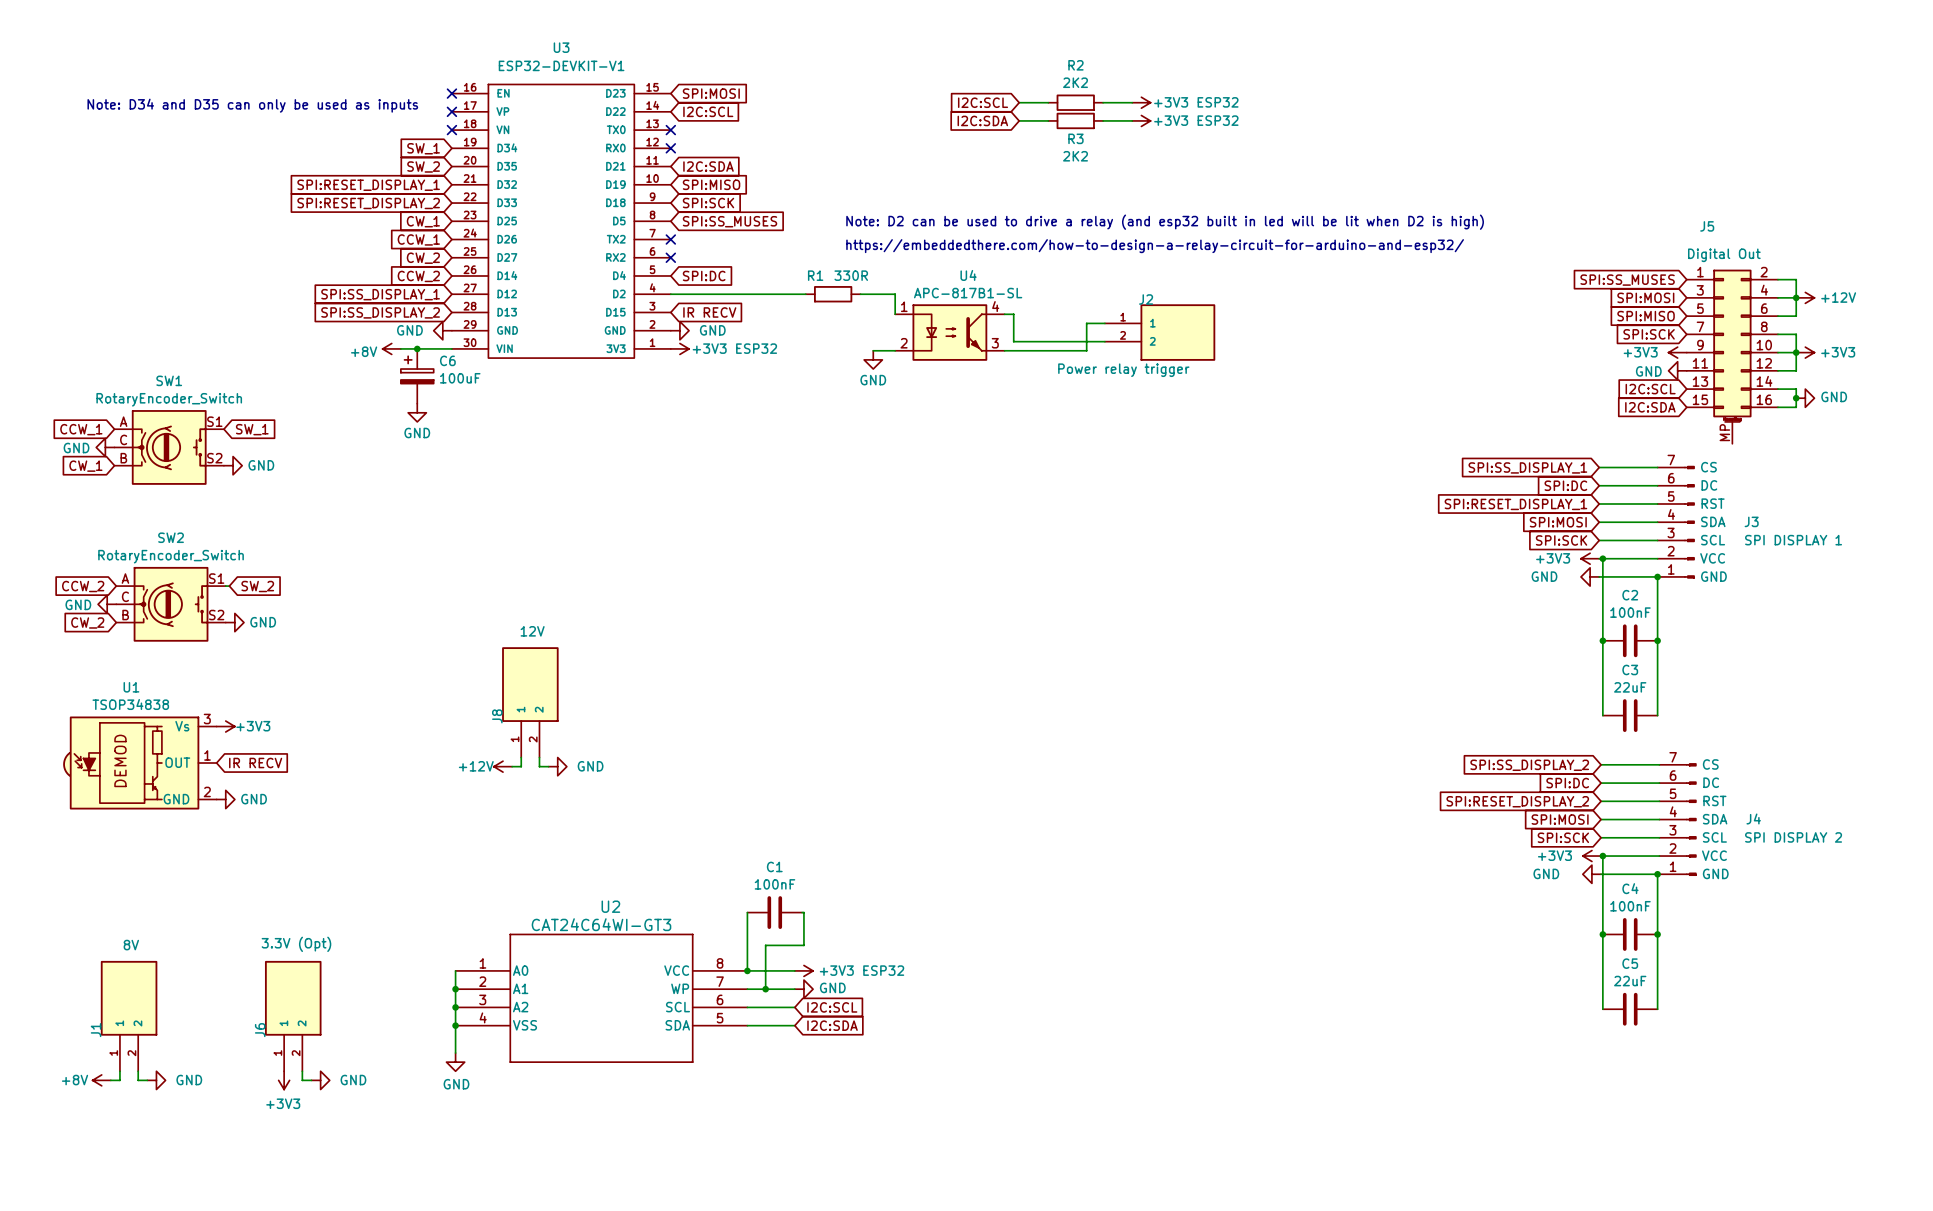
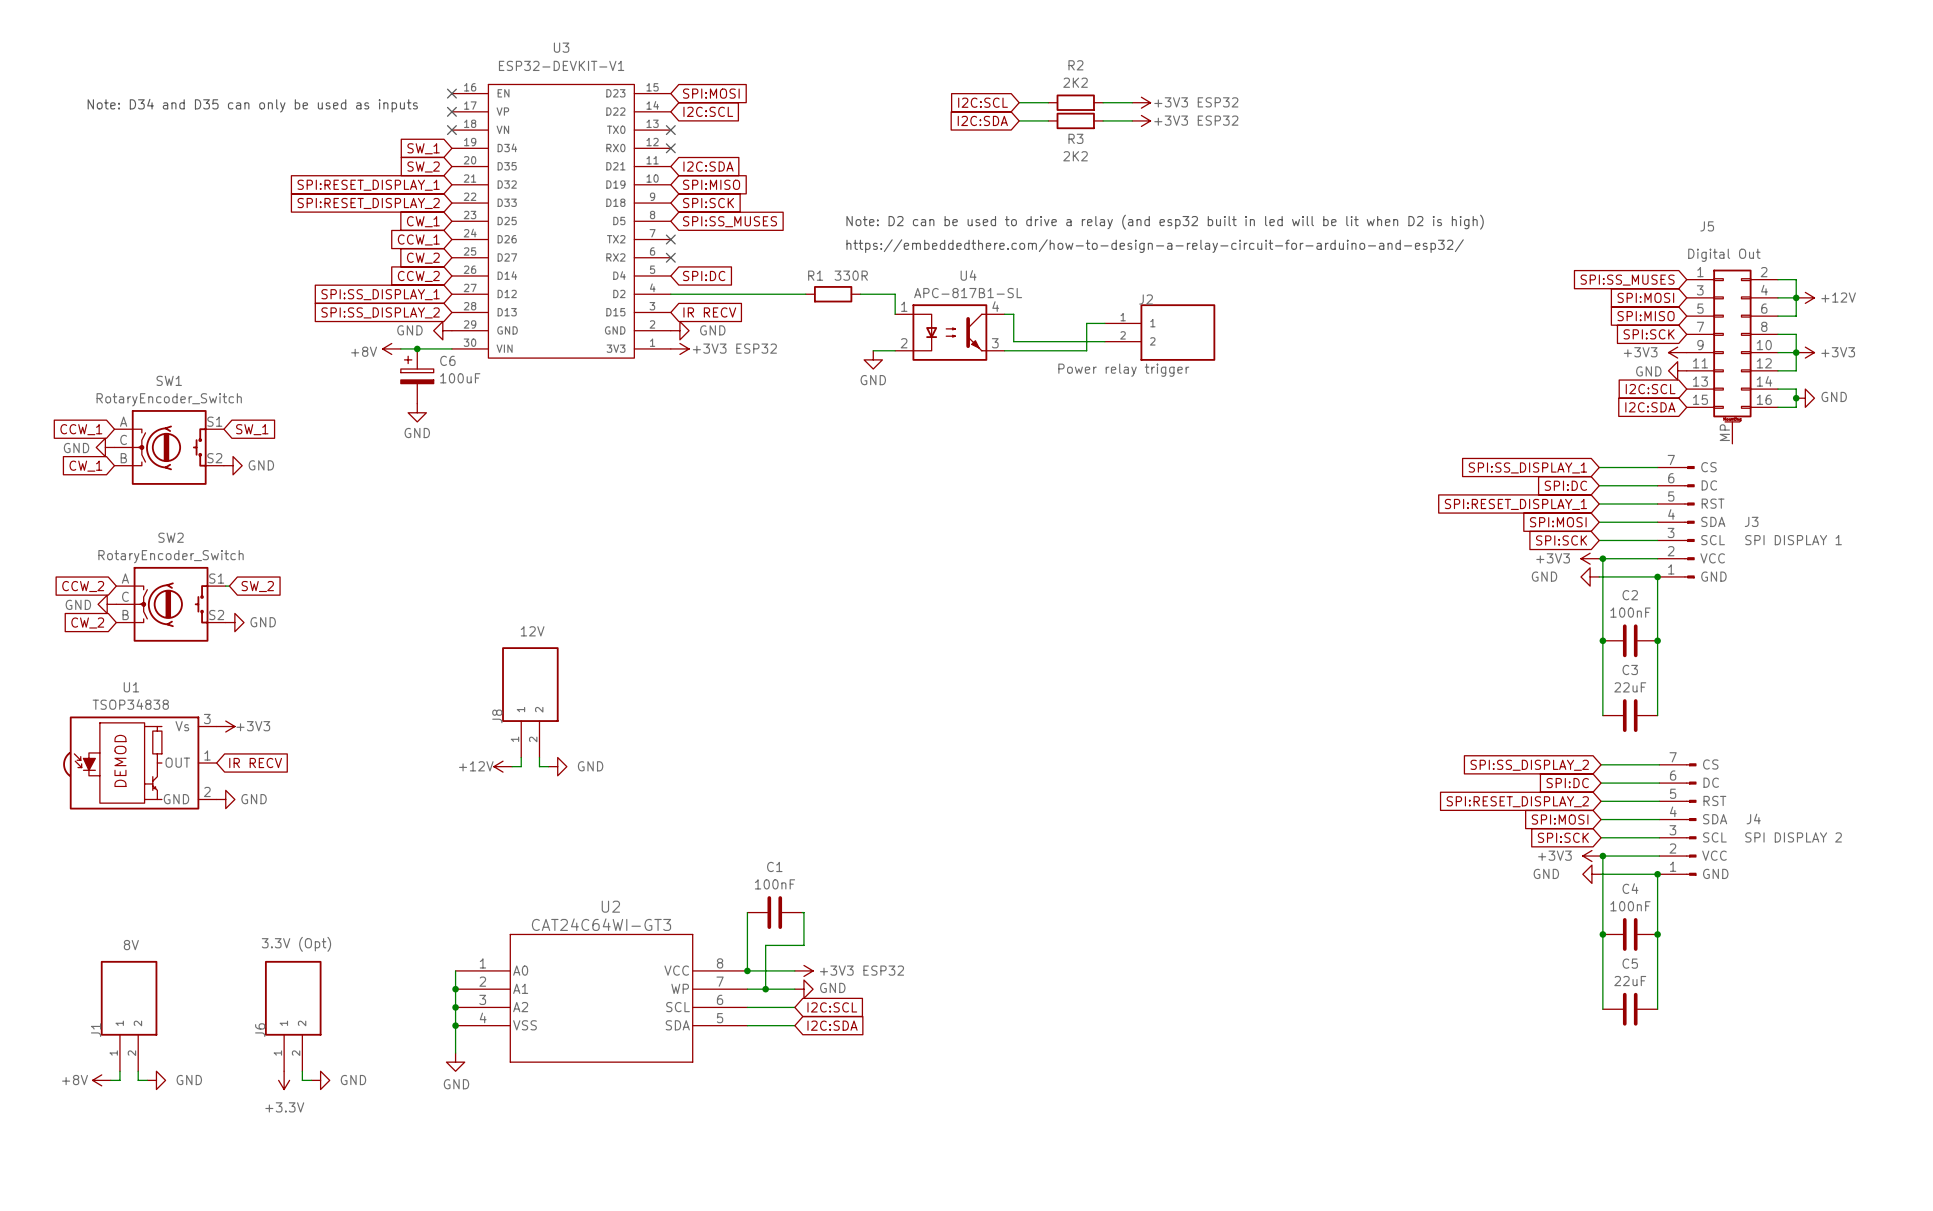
power symbol: +3V3 (284, 1080) -> +3.3V (284, 1080)

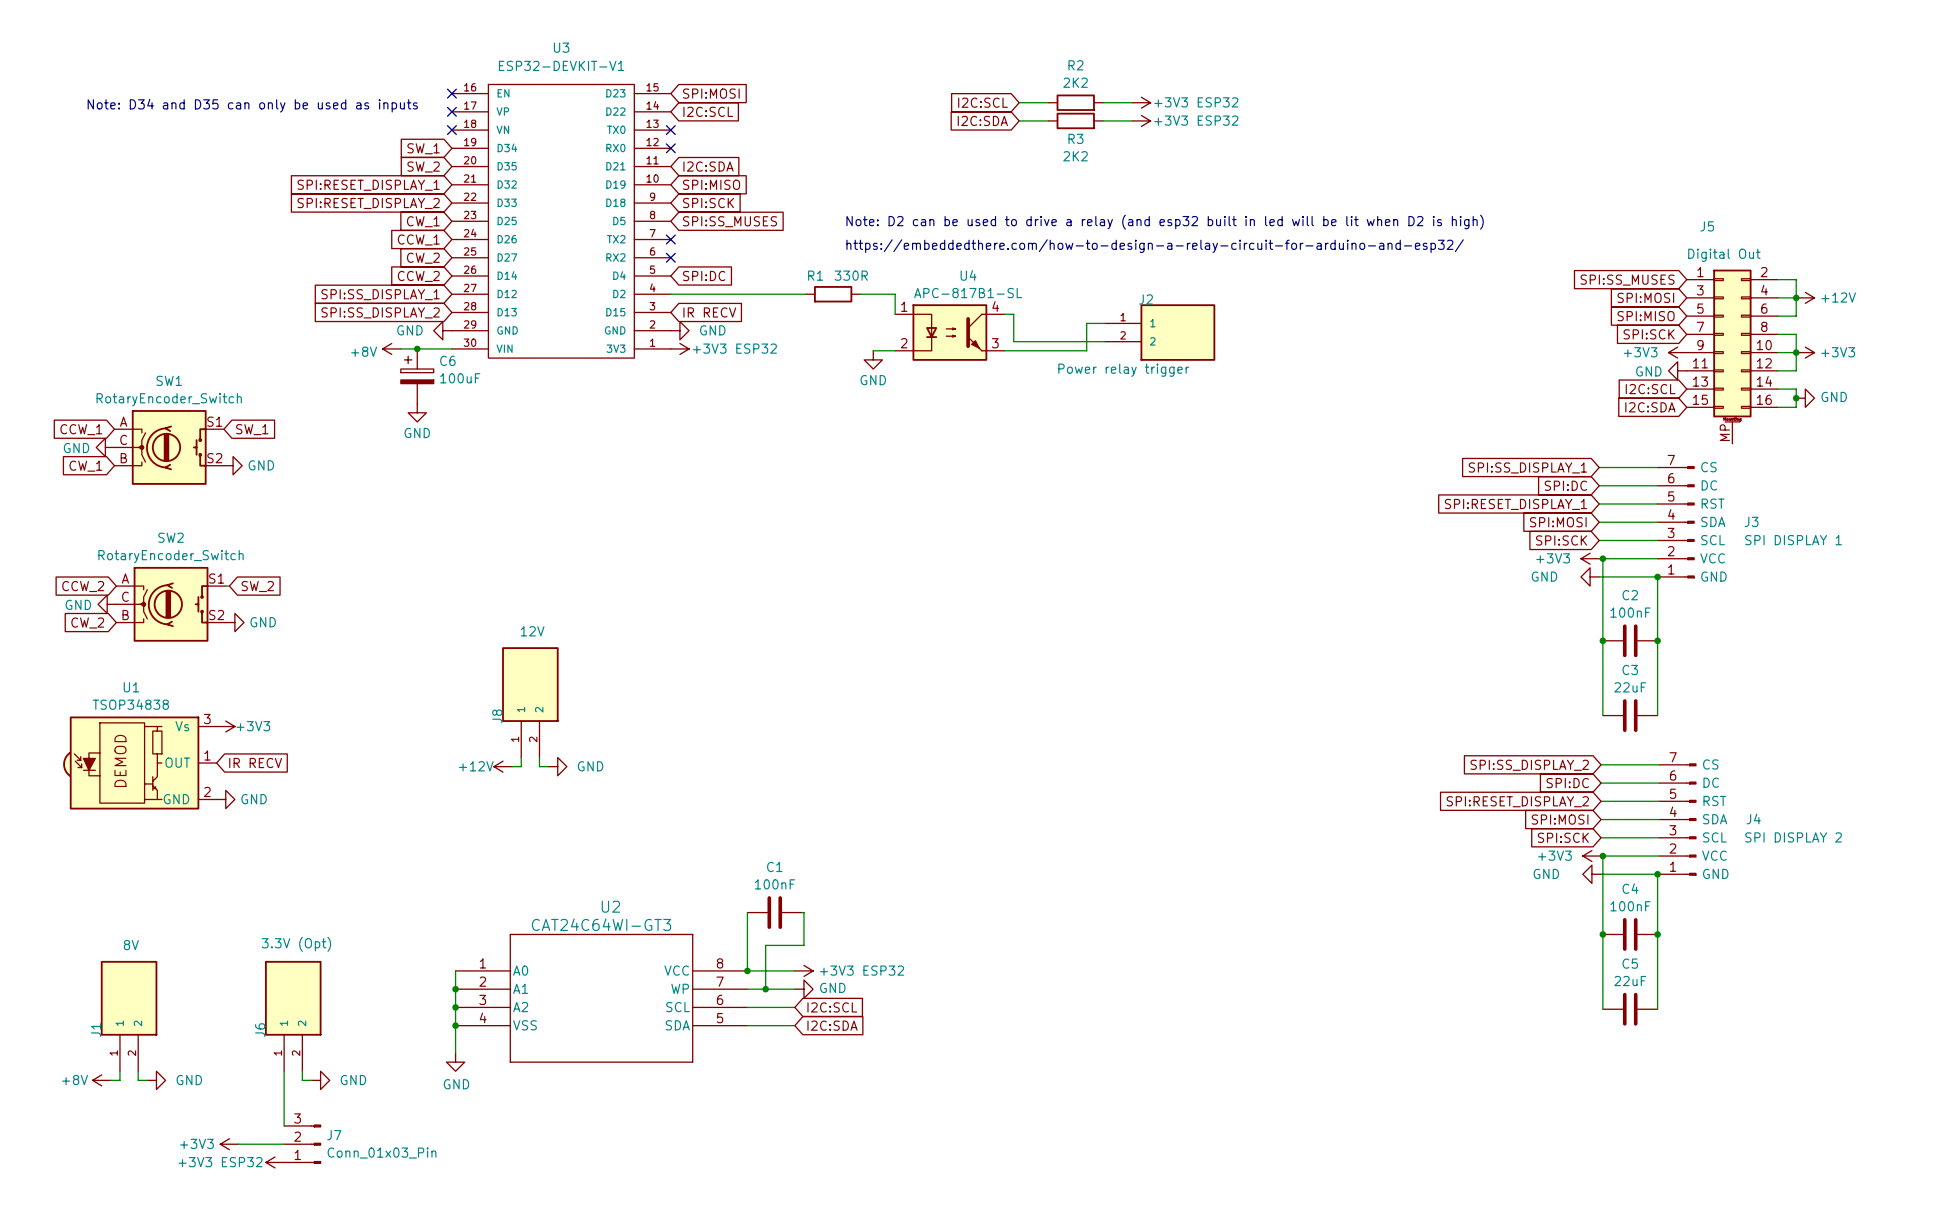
wire: none -> (284, 1071) (284, 1125)
power symbol: +3.3V (284, 1080) -> none
power symbol: none -> +3V3 (229, 1144)
wire: none -> (238, 1144) (284, 1144)
J7: none -> Conn_01x03_Pin (302, 1144)
power symbol: none -> +3V3 ESP32 (275, 1162)

